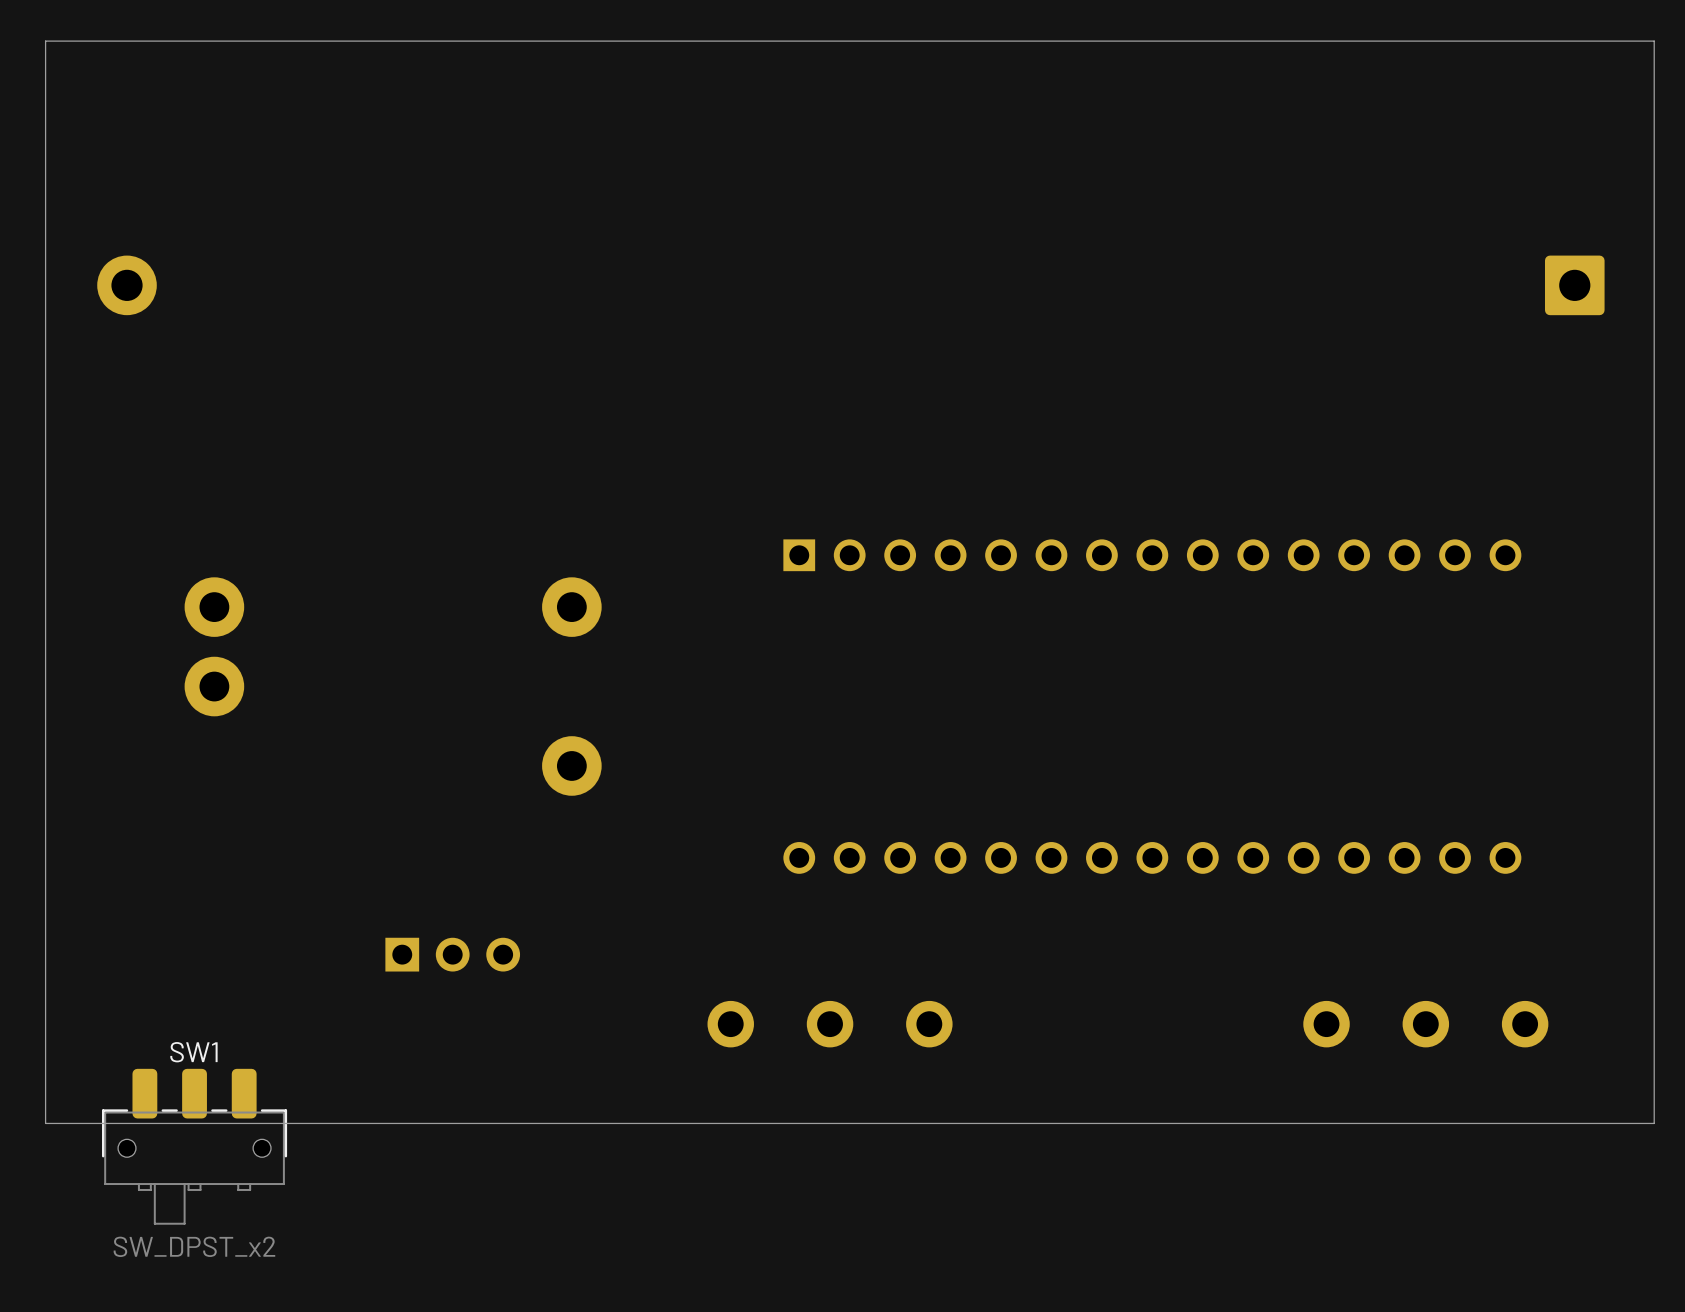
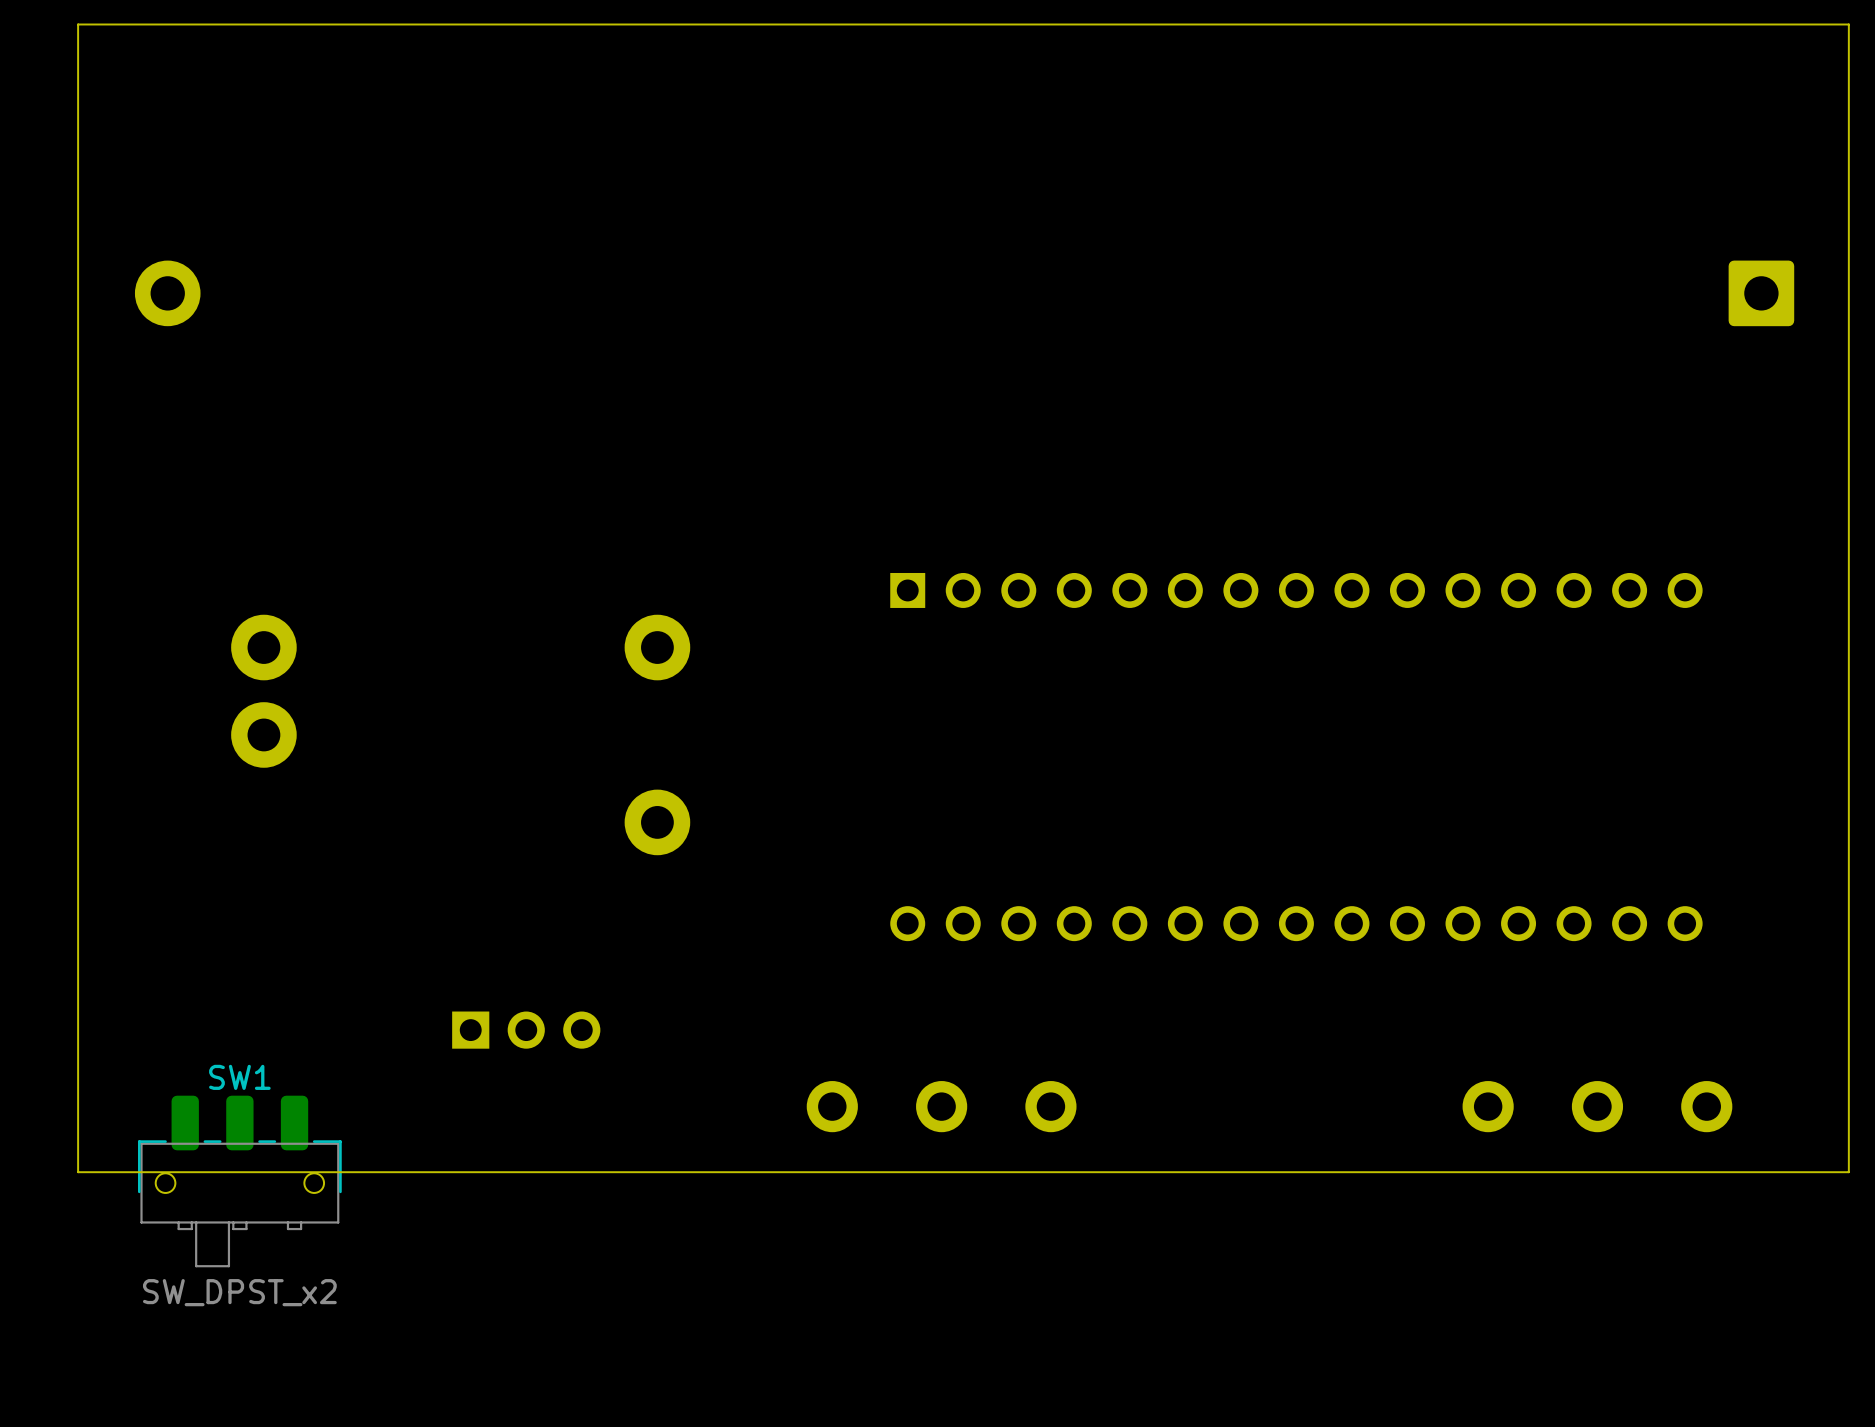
board edge: (1654, 1083) (1654, 1123) (45, 1123) (45, 1083) -> (1848, 1172) (78, 1172)
SW1 position: (194, 1146) -> (239, 1181)

